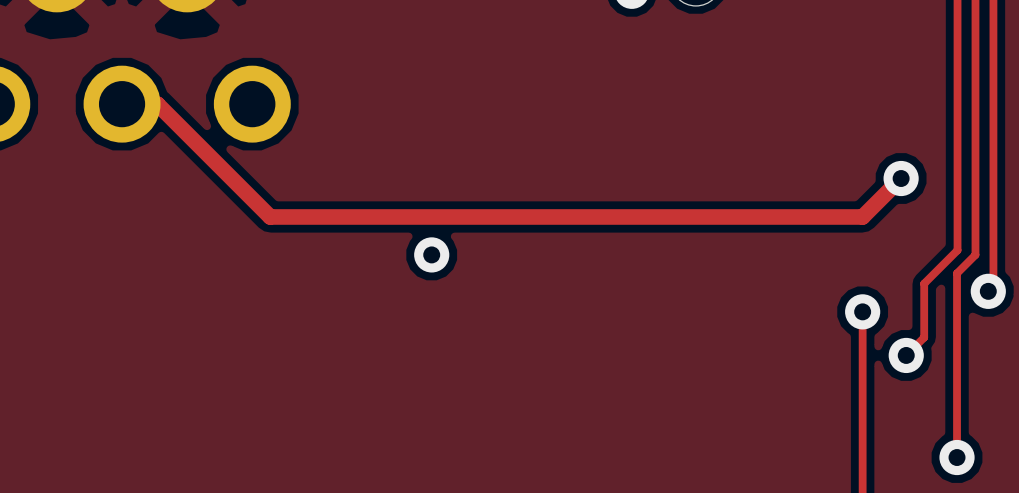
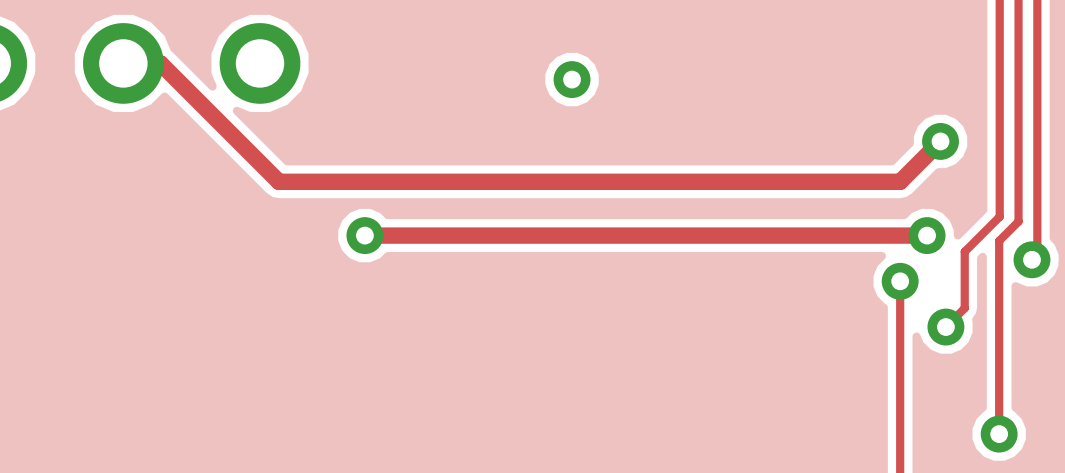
via: none -> (572, 79)
via position: (431, 254) -> (364, 235)
track: none -> (364, 235) (927, 235)
via: none -> (927, 235)

